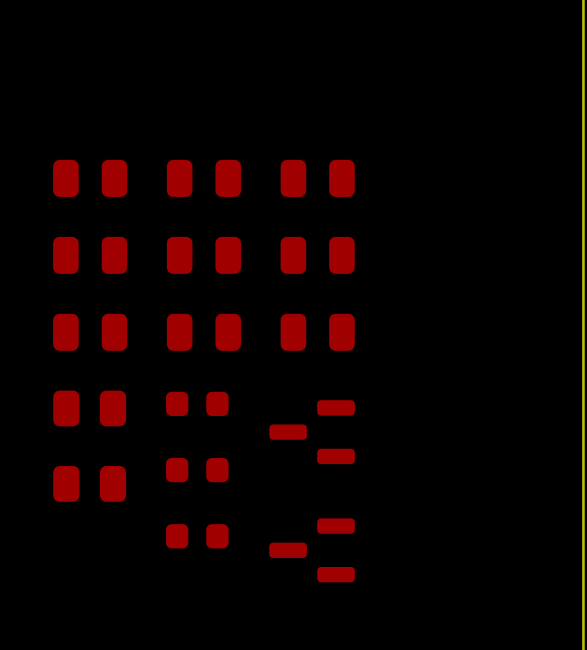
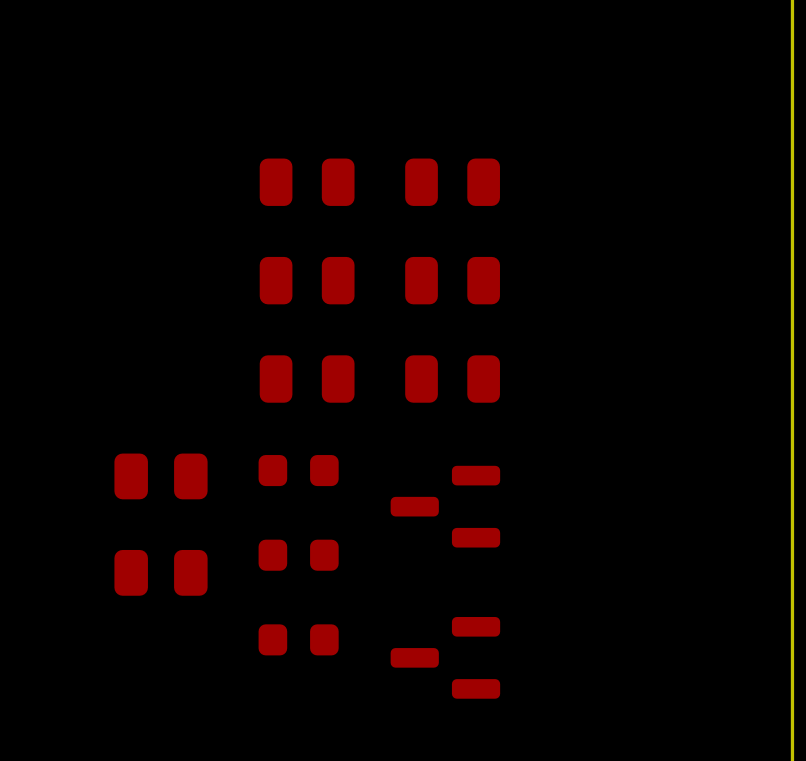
part: (90, 178) -> none
part: (90, 255) -> none
part: (90, 332) -> none

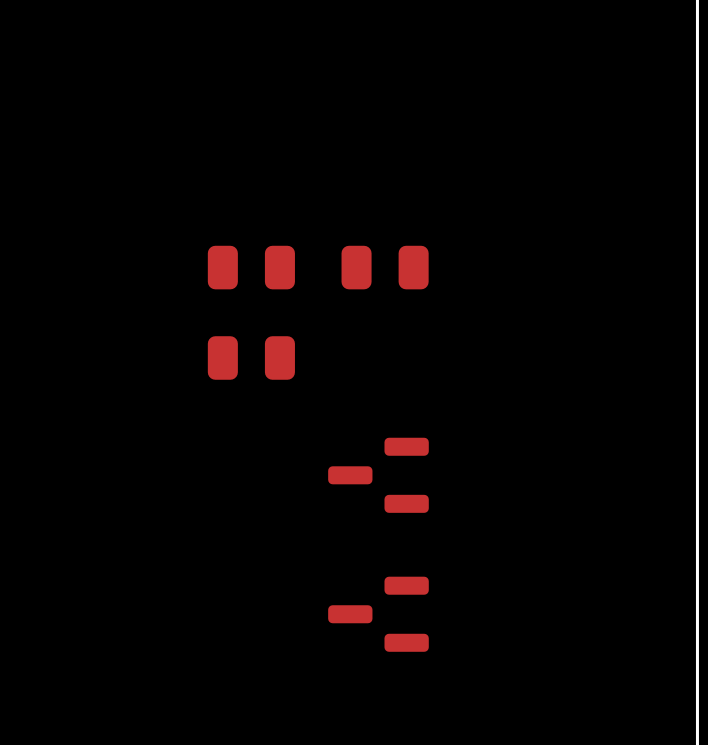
part: (307, 182) -> none
part: (452, 182) -> none
part: (452, 379) -> none
part: (298, 470) -> none
part: (161, 476) -> none
part: (298, 555) -> none
part: (161, 572) -> none
part: (298, 639) -> none

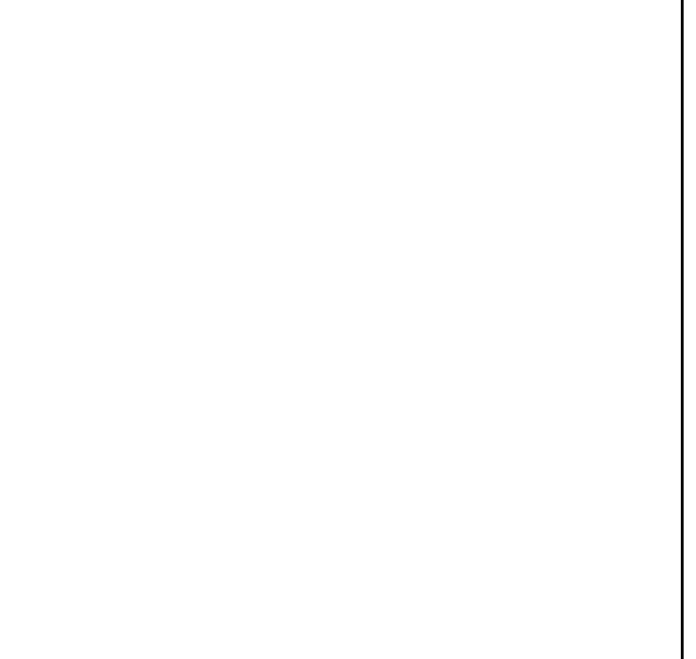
part: (251, 267) -> none
part: (385, 267) -> none
part: (251, 357) -> none
part: (378, 475) -> none
part: (378, 614) -> none

